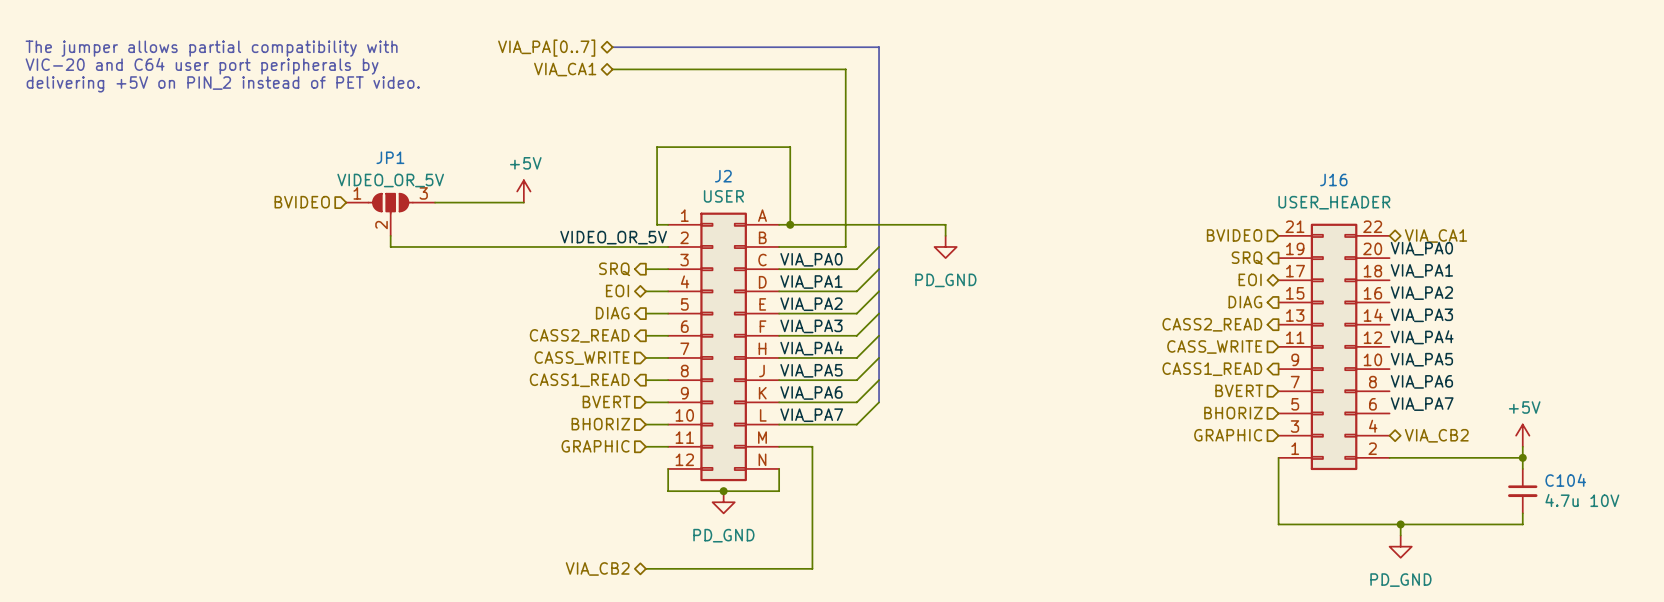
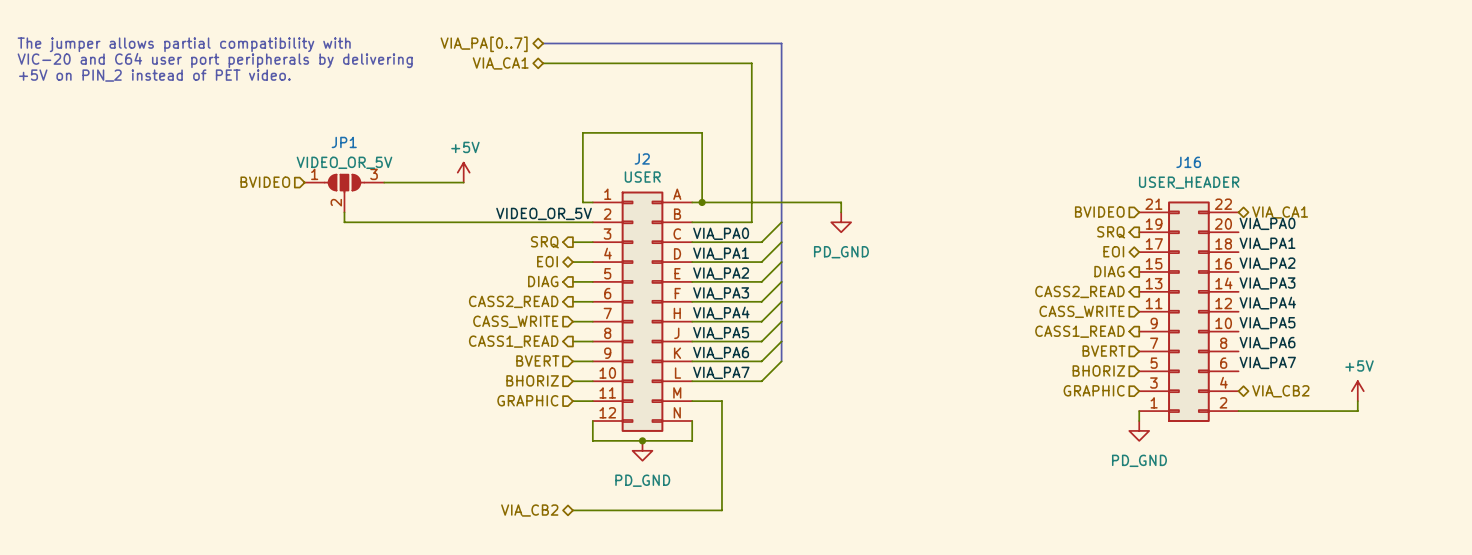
text: VIC-20 and C64 user port peripherals by (202, 66) -> VIC-20 and C64 user port peripherals by delivering (215, 60)
text: delivering +5V on PIN_2 instead of PET video. (223, 84) -> +5V on PIN_2 instead of PET video. (154, 75)
wire: (1522, 457) (1522, 468) -> none
junction: (1522, 457) -> none
wire: (1278, 468) (1278, 524) (1522, 524) (1522, 513) -> none
C104: 4.7u 10V (1522, 491) -> none
wire: (1400, 524) (1400, 535) -> none
junction: (1400, 524) -> none
power symbol position: PD_GND (1400, 546) -> PD_GND (1139, 430)

